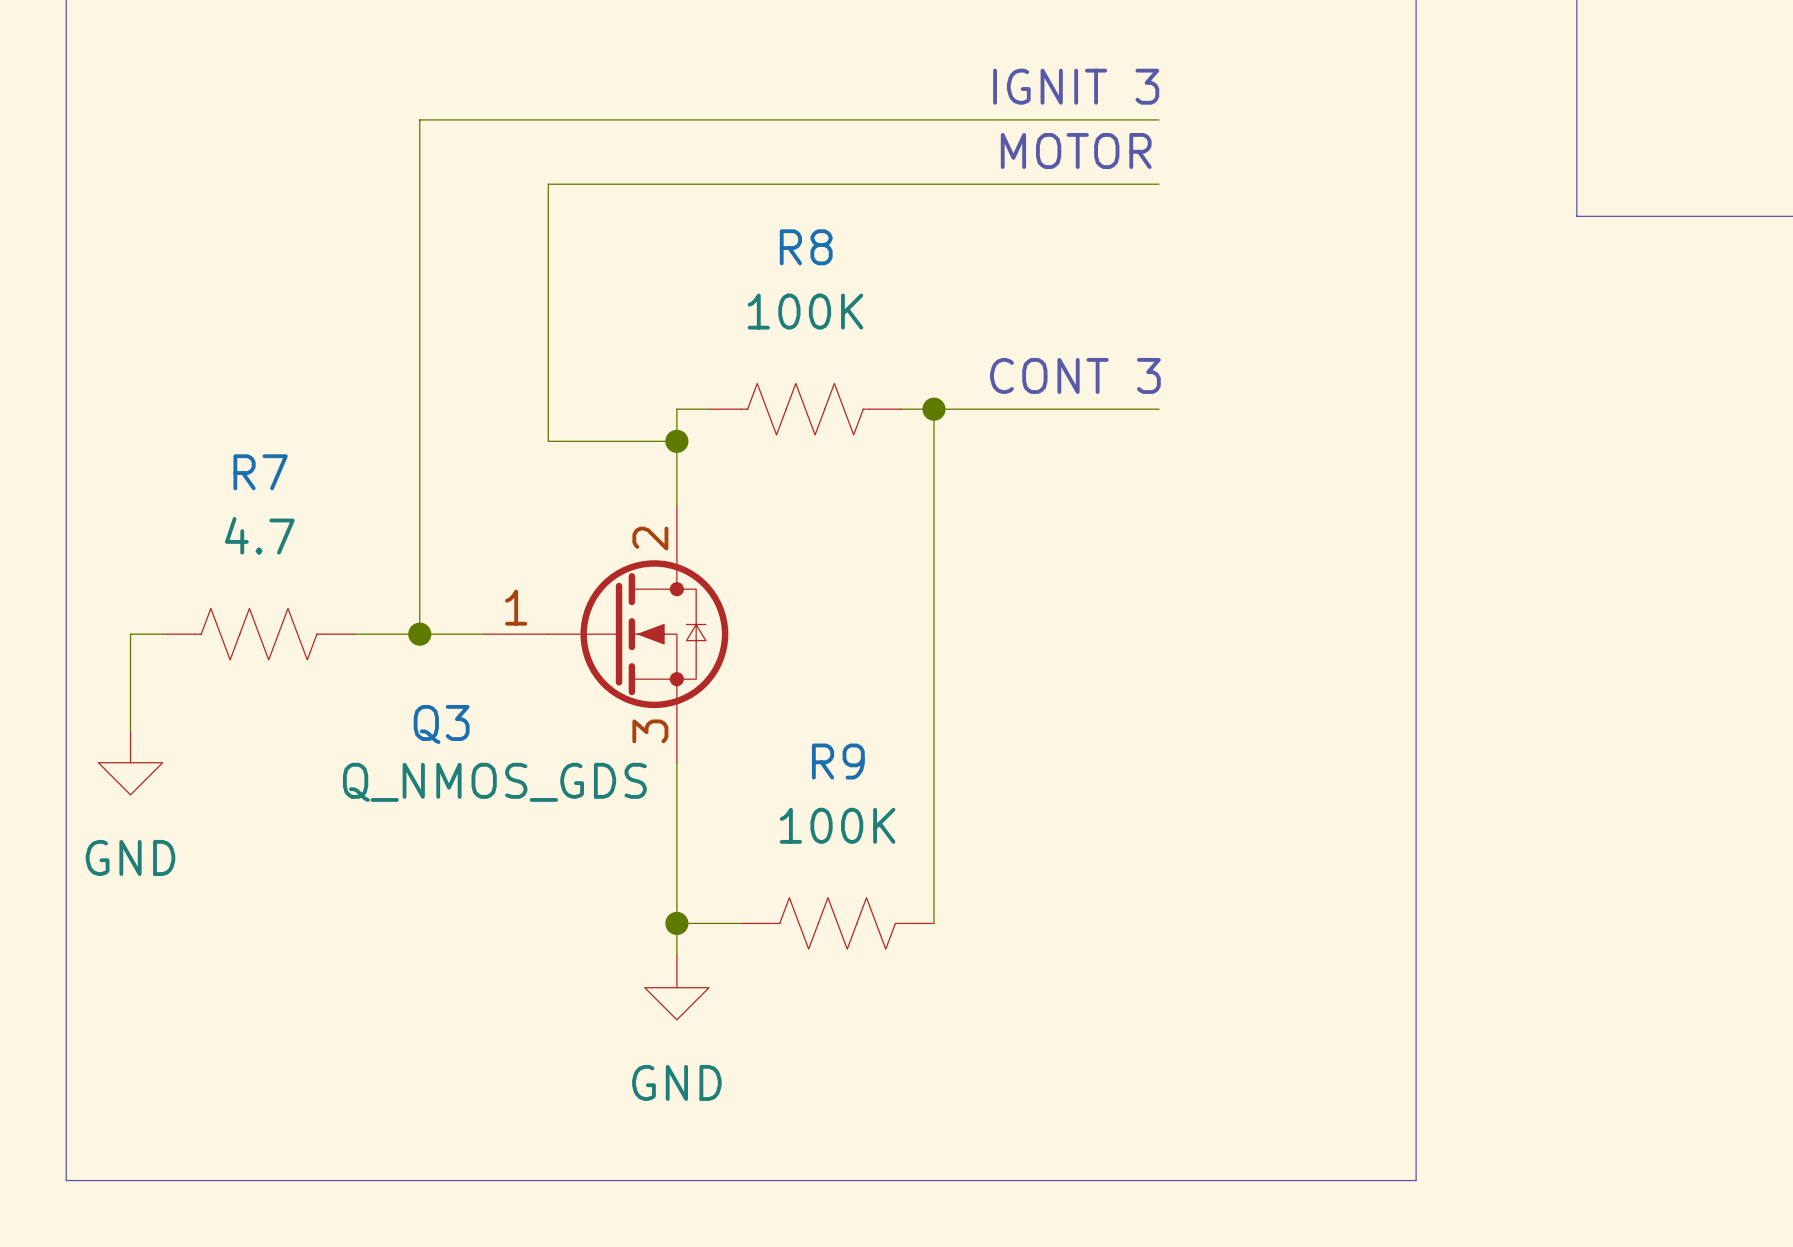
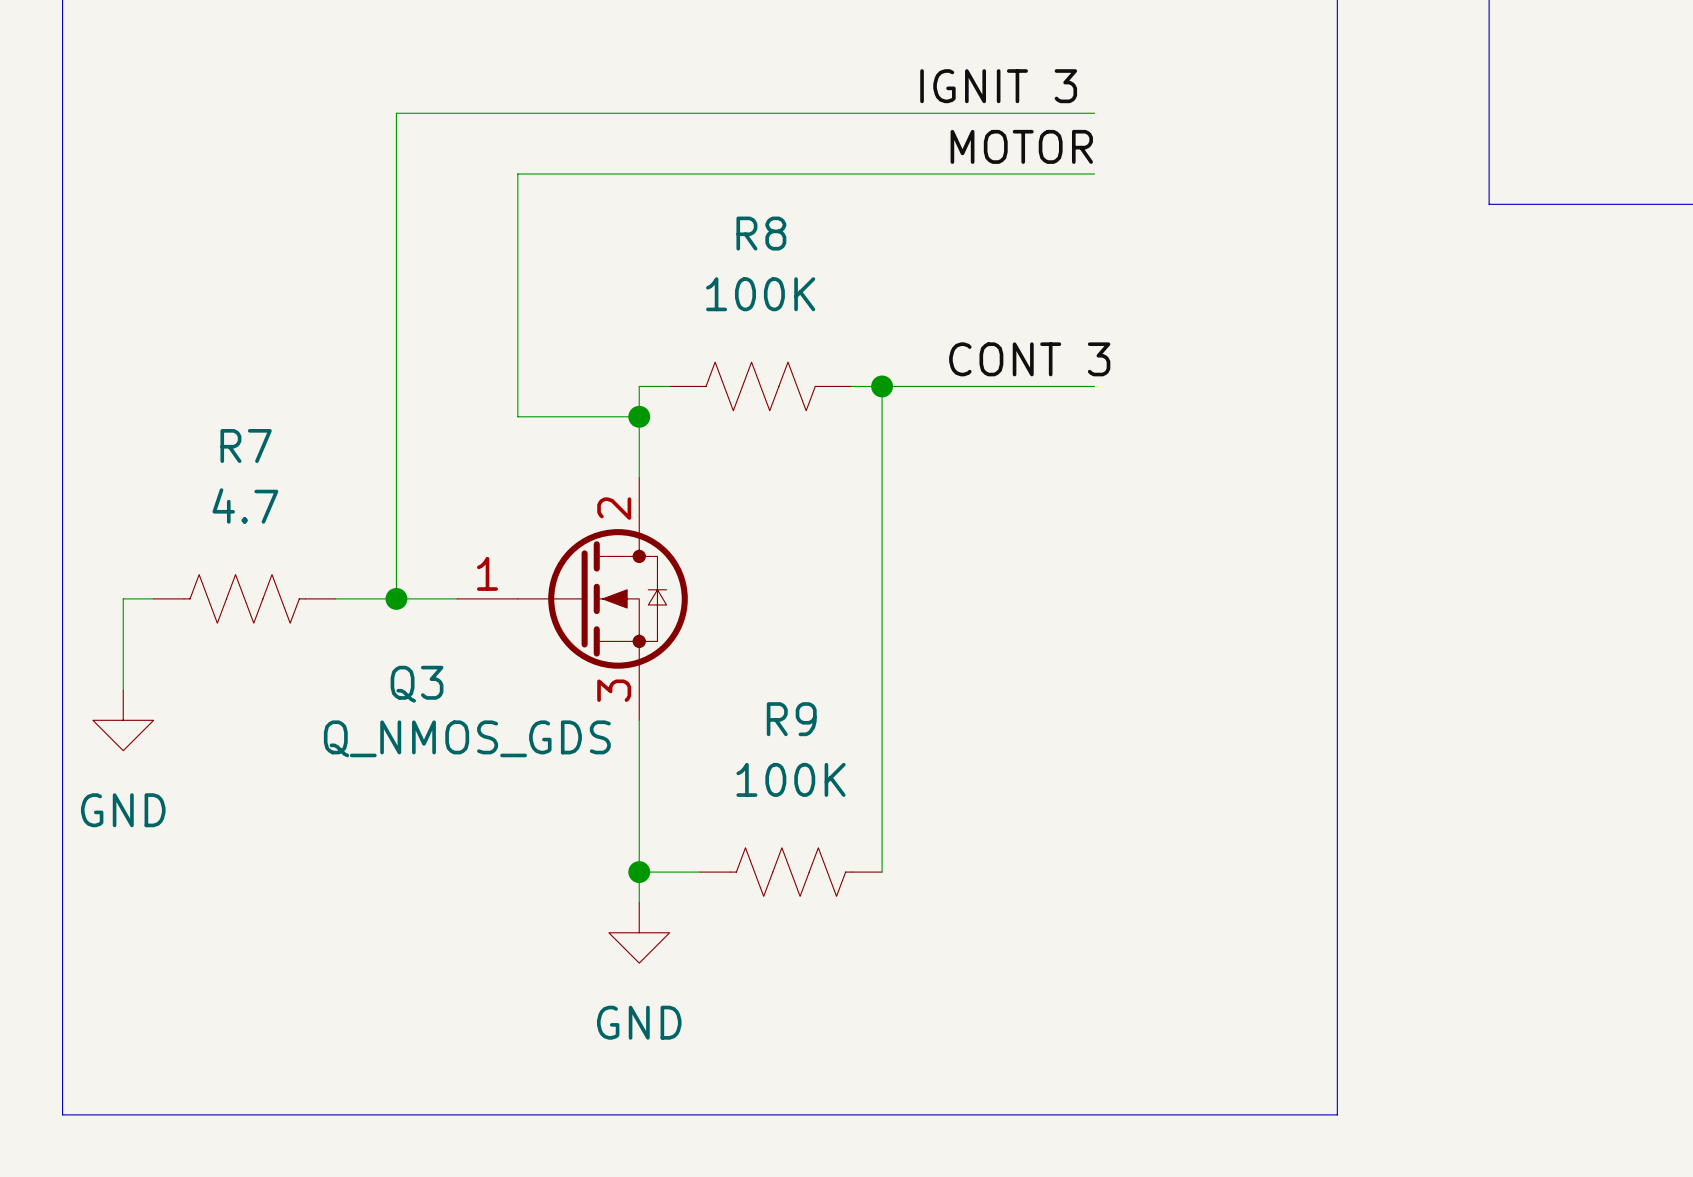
text: IGNIT 3 (1076, 86) -> none
label: none -> IGNIT 3 (998, 86)
text: MOTOR (1076, 150) -> none
label: none -> MOTOR (1021, 146)
text: CONT 3 (1075, 375) -> none
label: none -> CONT 3 (1029, 359)

